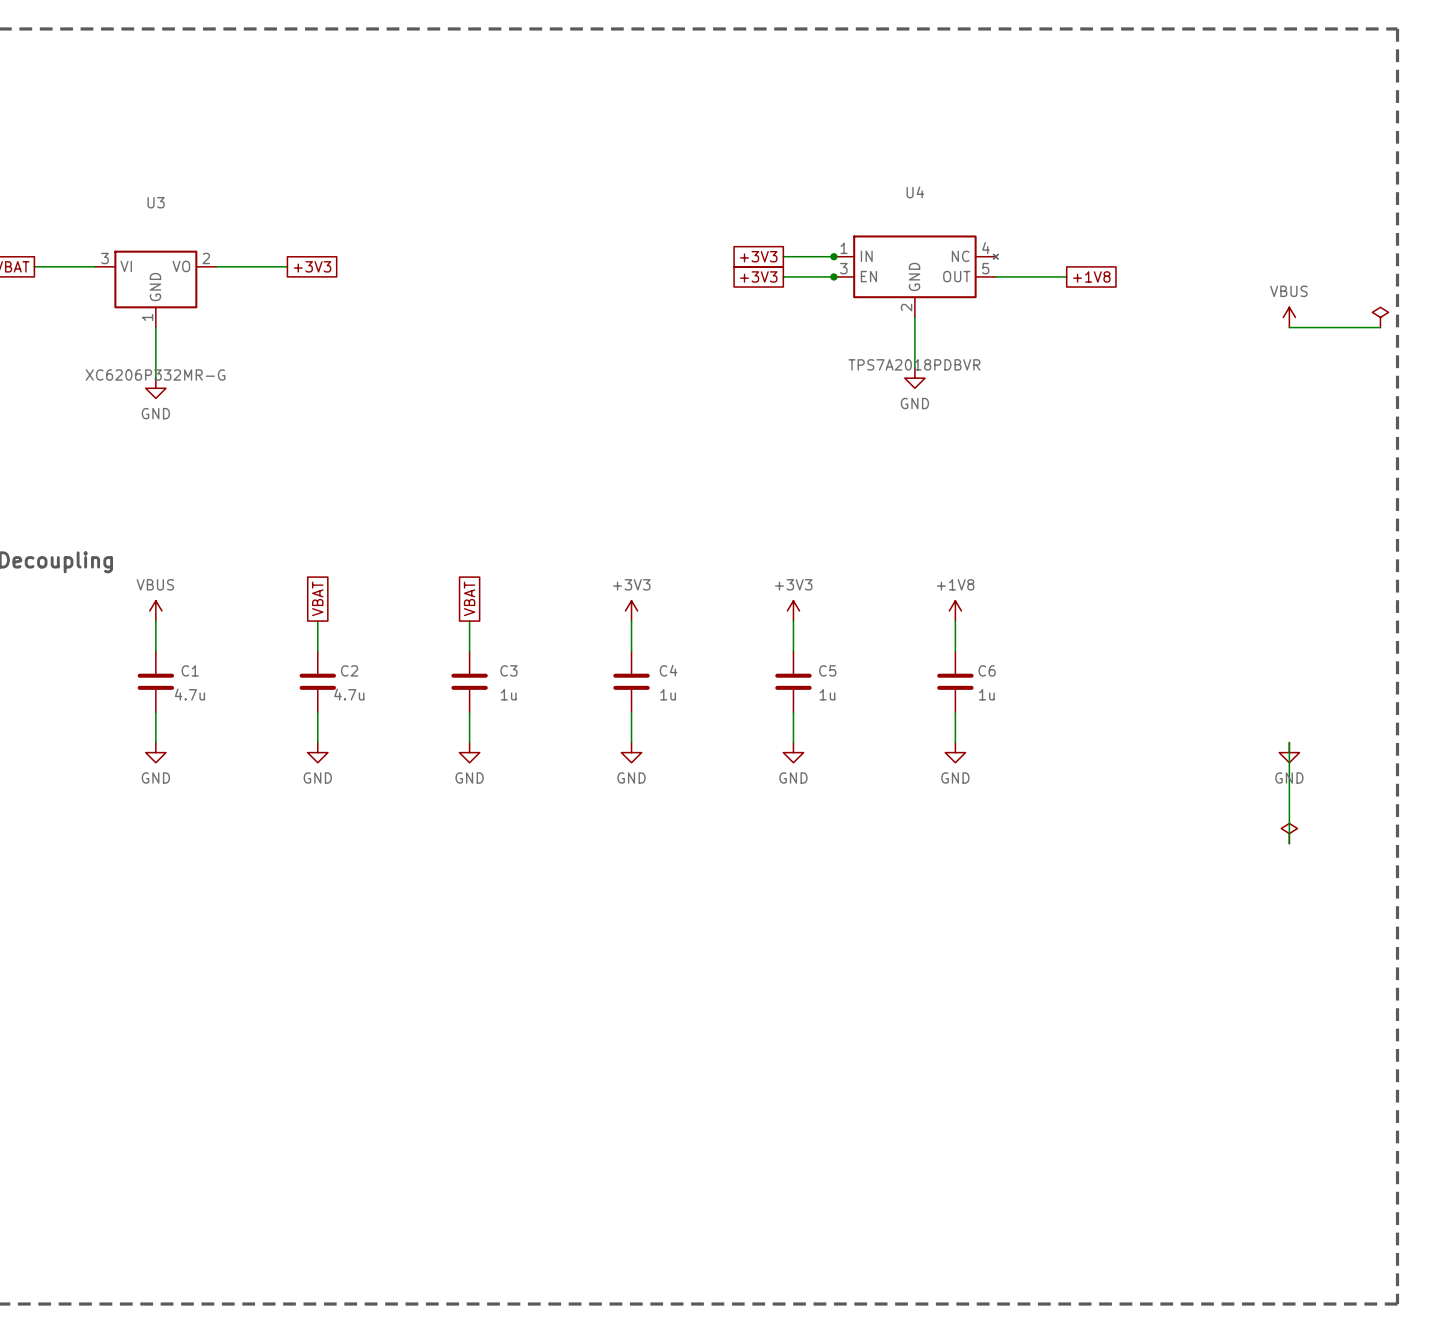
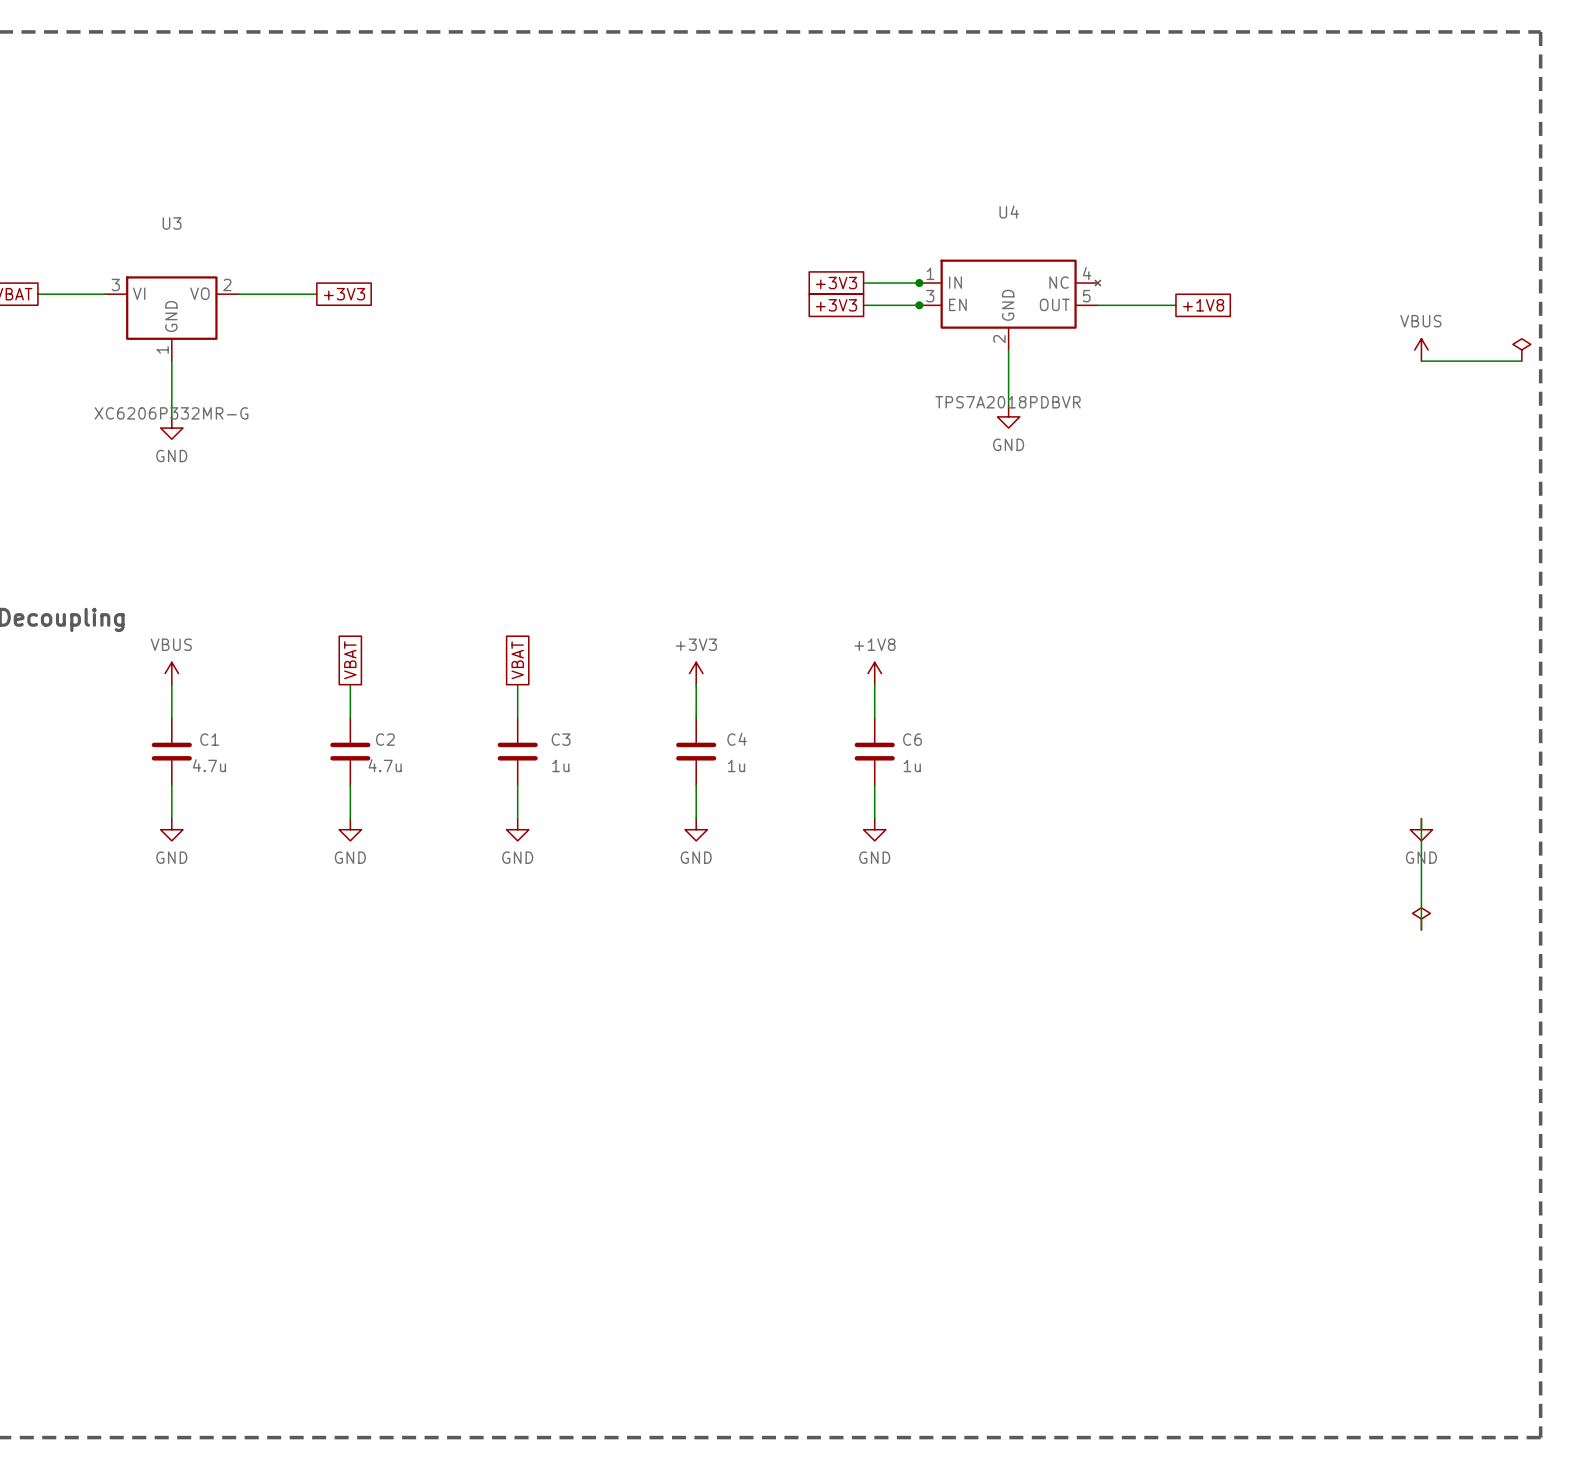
power symbol: +3V3 (793, 610) -> +1V8 (874, 673)
power symbol: +1V8 (955, 610) -> none
wire: (955, 621) (955, 651) -> none
C5 name: C5 (827, 670) -> C6 (912, 739)
C6: 1u (955, 681) -> none
wire: (955, 712) (955, 742) -> none
power symbol: GND (955, 752) -> none

